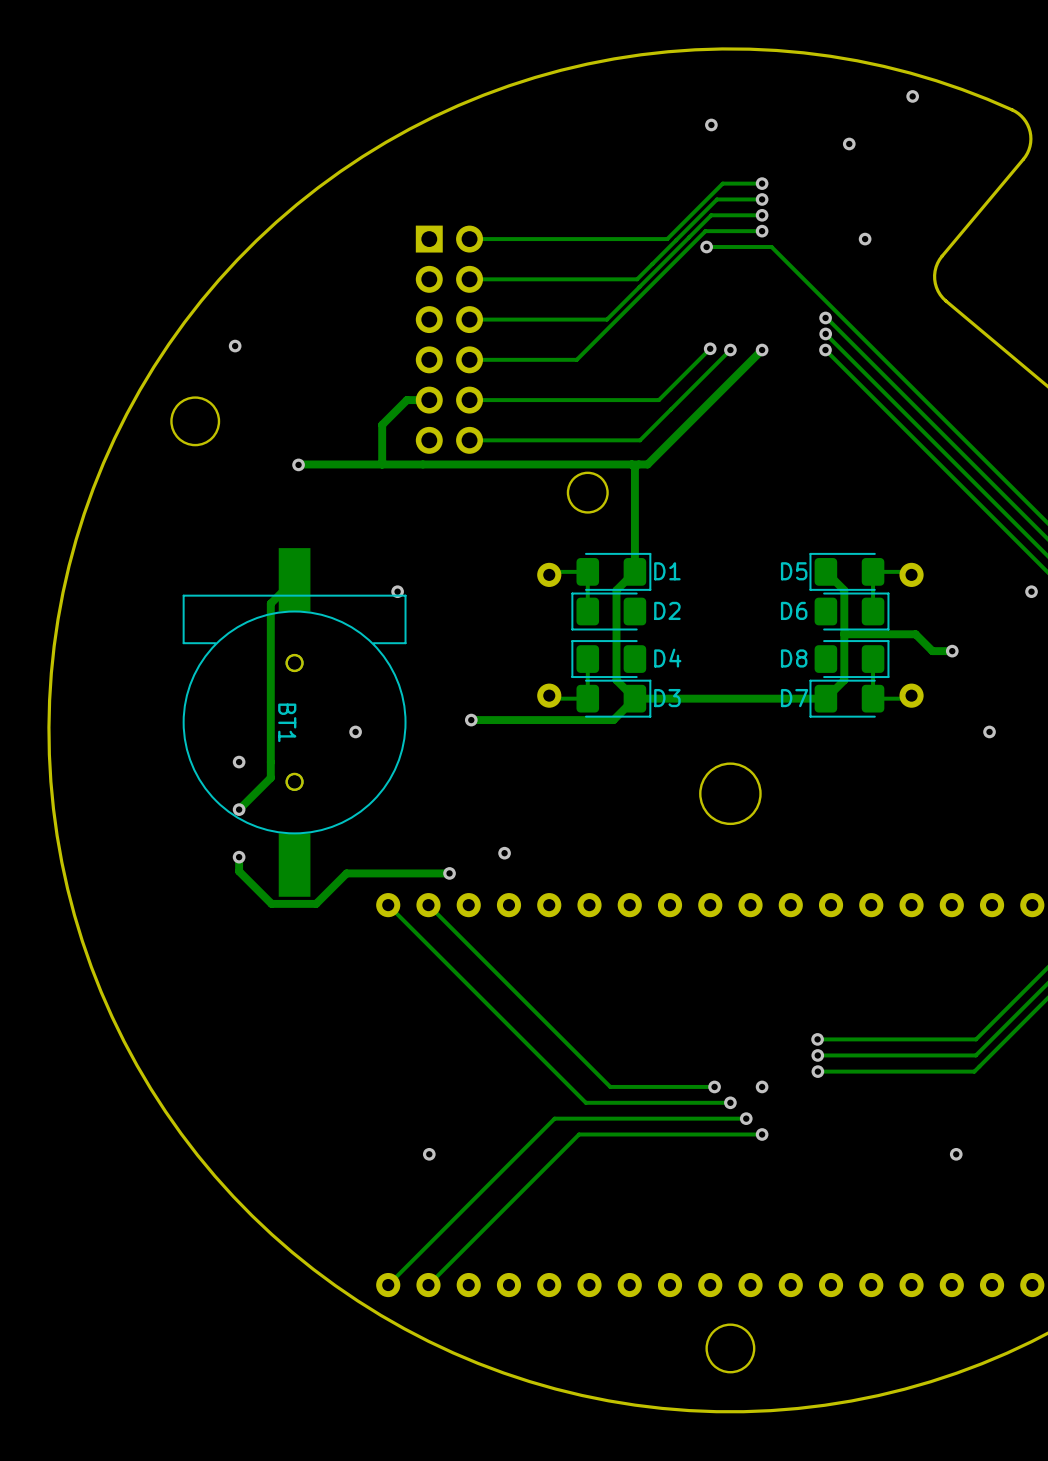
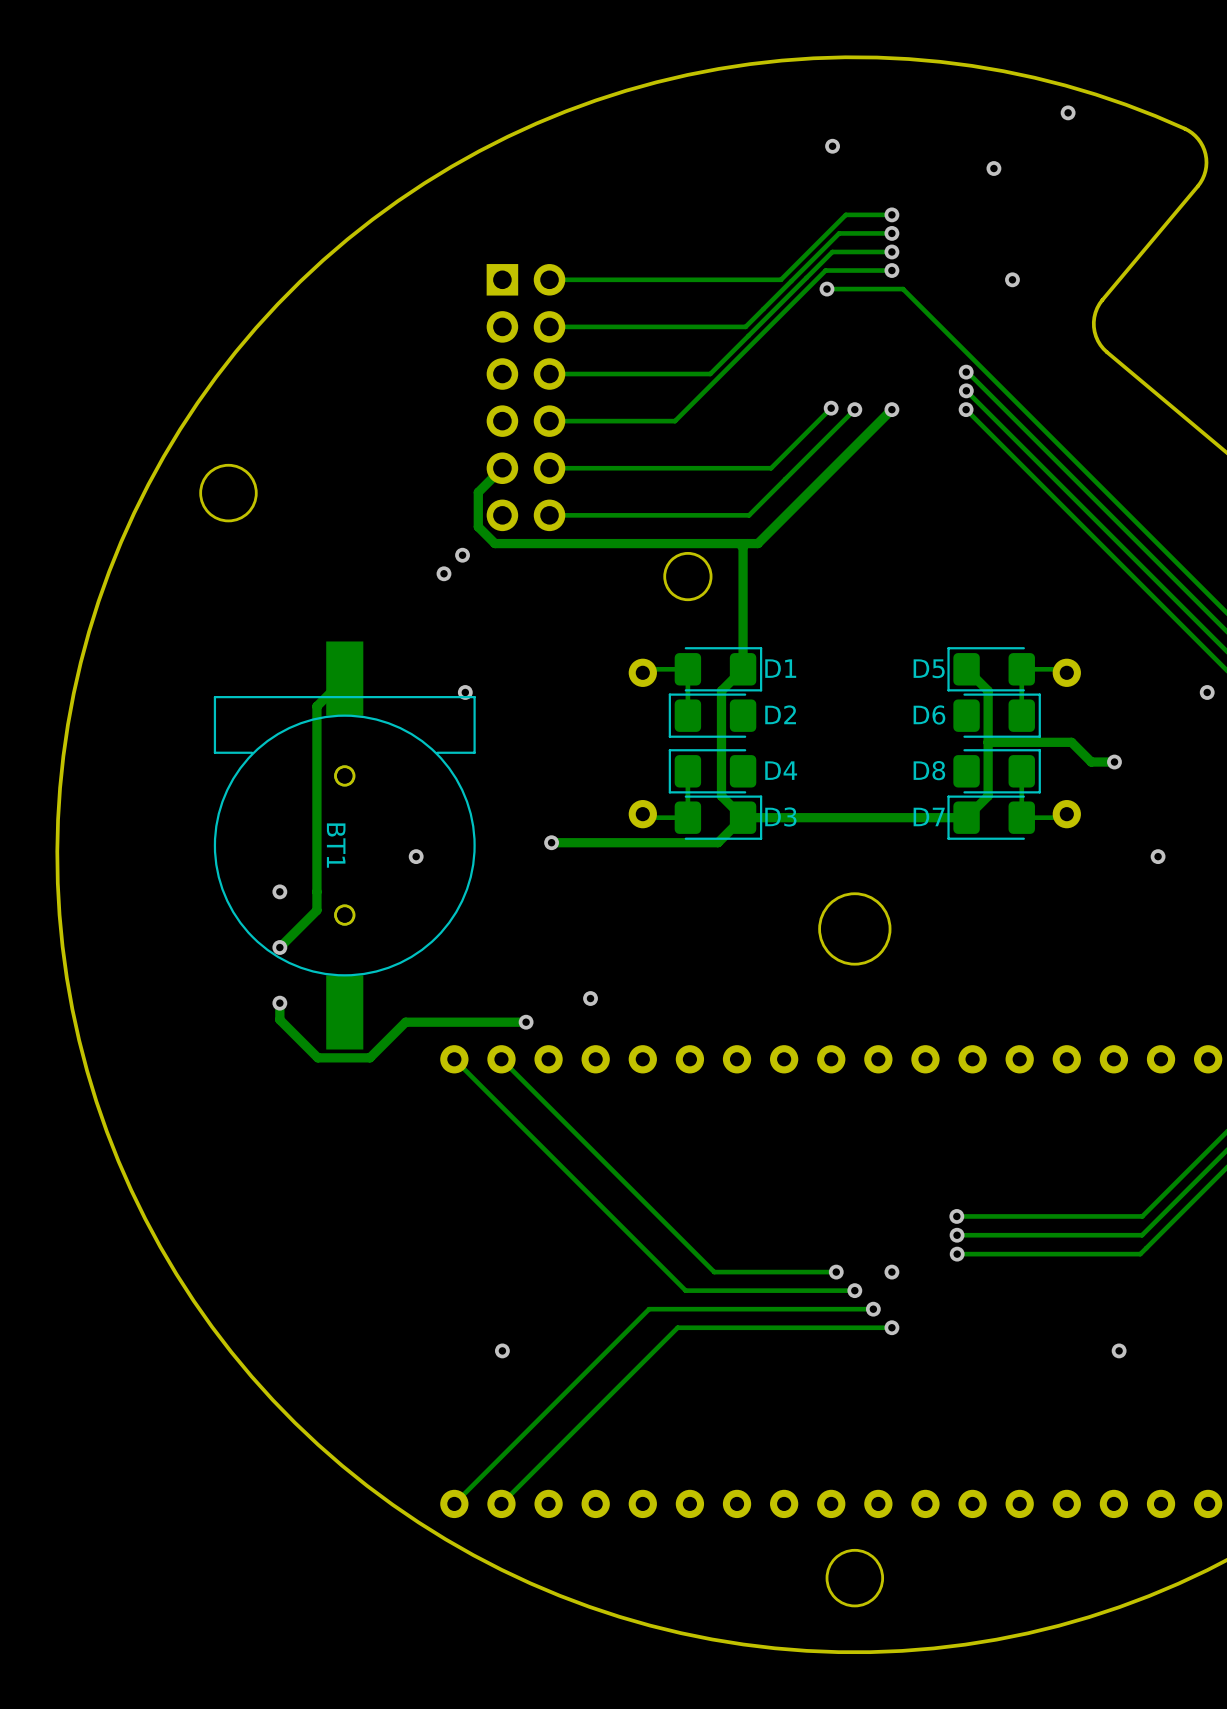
via: (235, 346) -> none
track: (429, 400) (406, 400) (382, 424) (382, 464) -> (502, 468) (478, 492) (478, 526) (494, 543)
via: (298, 464) -> none
track: (422, 464) (298, 464) -> none
via: none -> (462, 555)
via: none -> (443, 573)

